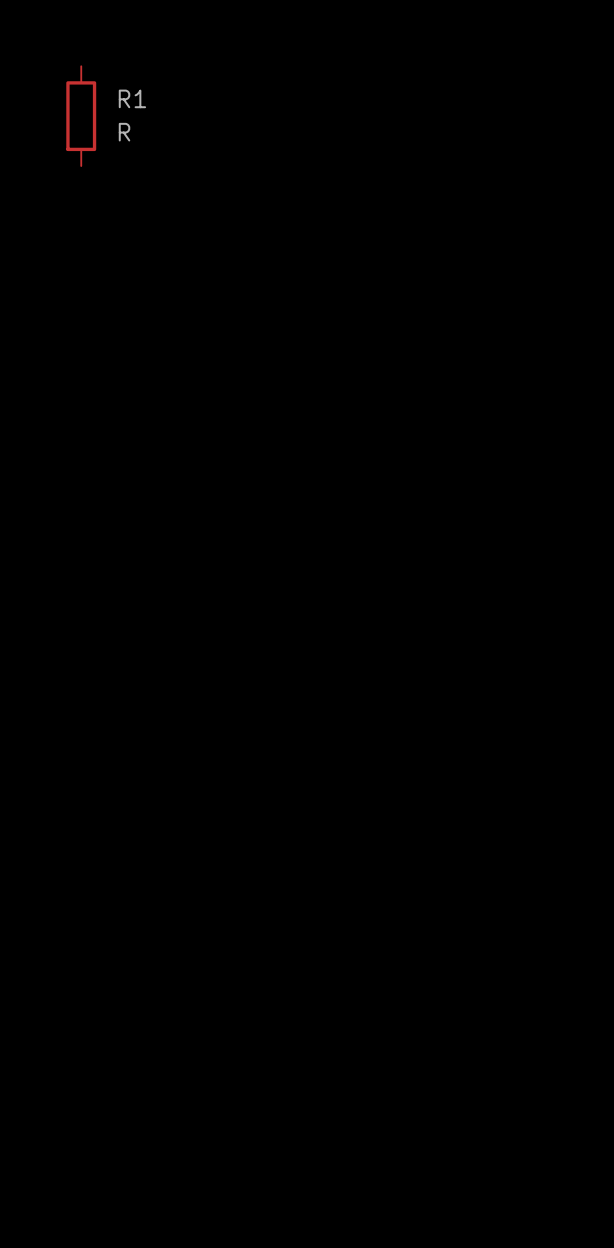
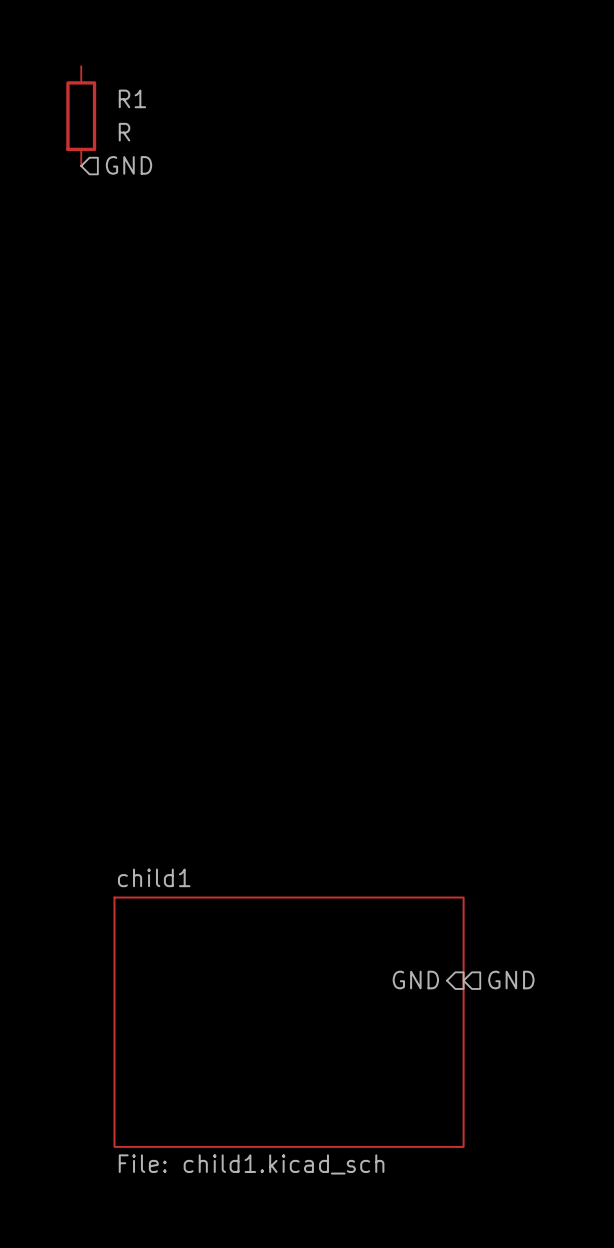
hierarchical label: none -> GND (129, 165)
sheet pin: none -> GND (415, 980)
hierarchical label: none -> GND (511, 980)
sheet child1: none -> File: child1.kicad_sch (289, 1022)

